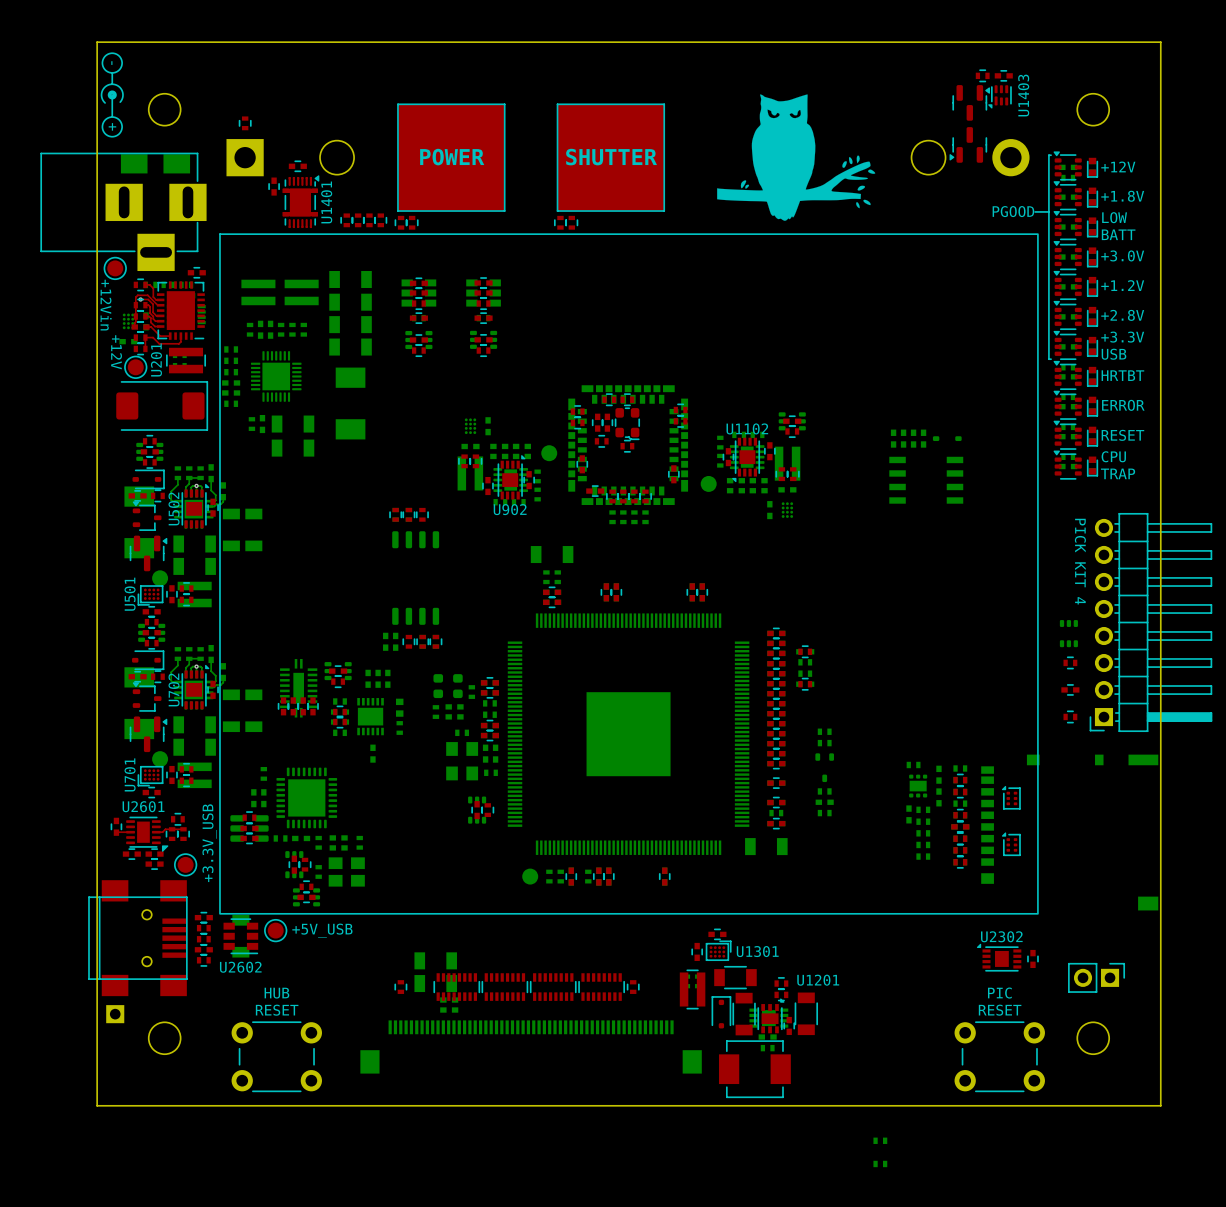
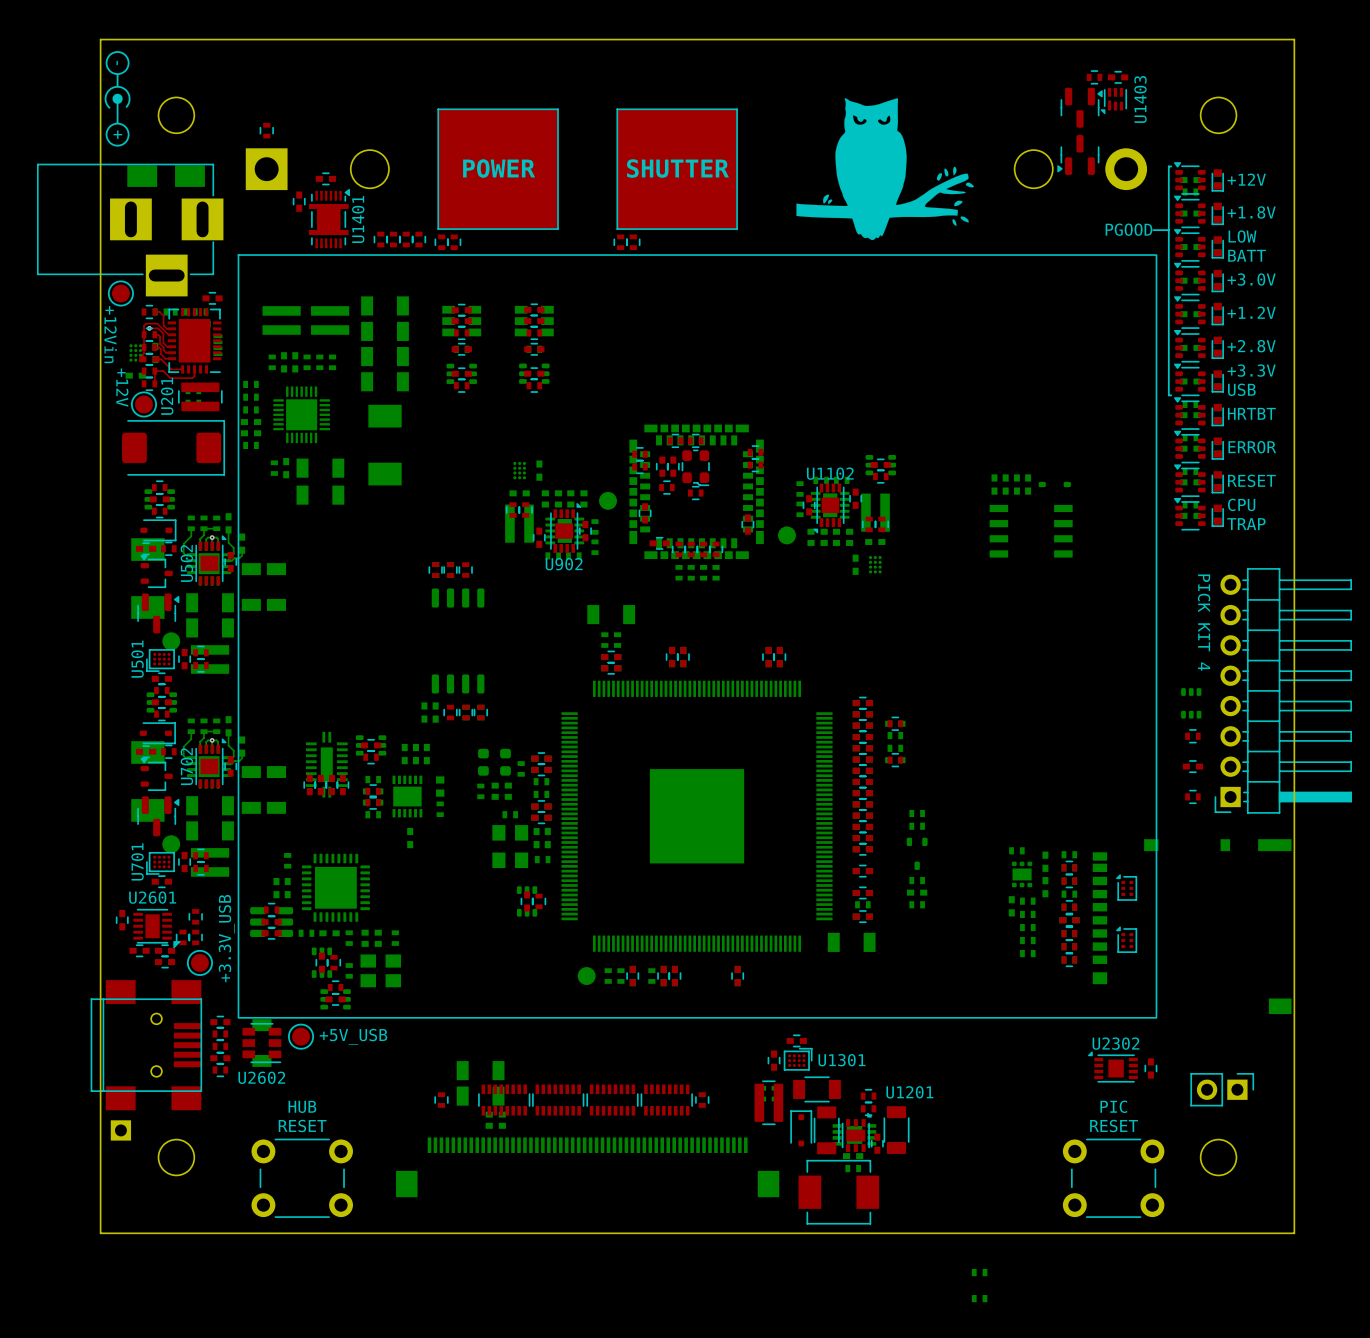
part: (177, 819) -> none
part: none -> (195, 916)
top track: (183, 829) (165, 829) (162, 832) (156, 832) -> none
top track: (130, 832) (116, 832) -> none
part: (172, 834) -> none
part: (183, 834) -> none
part: none -> (182, 937)
part: none -> (195, 937)

